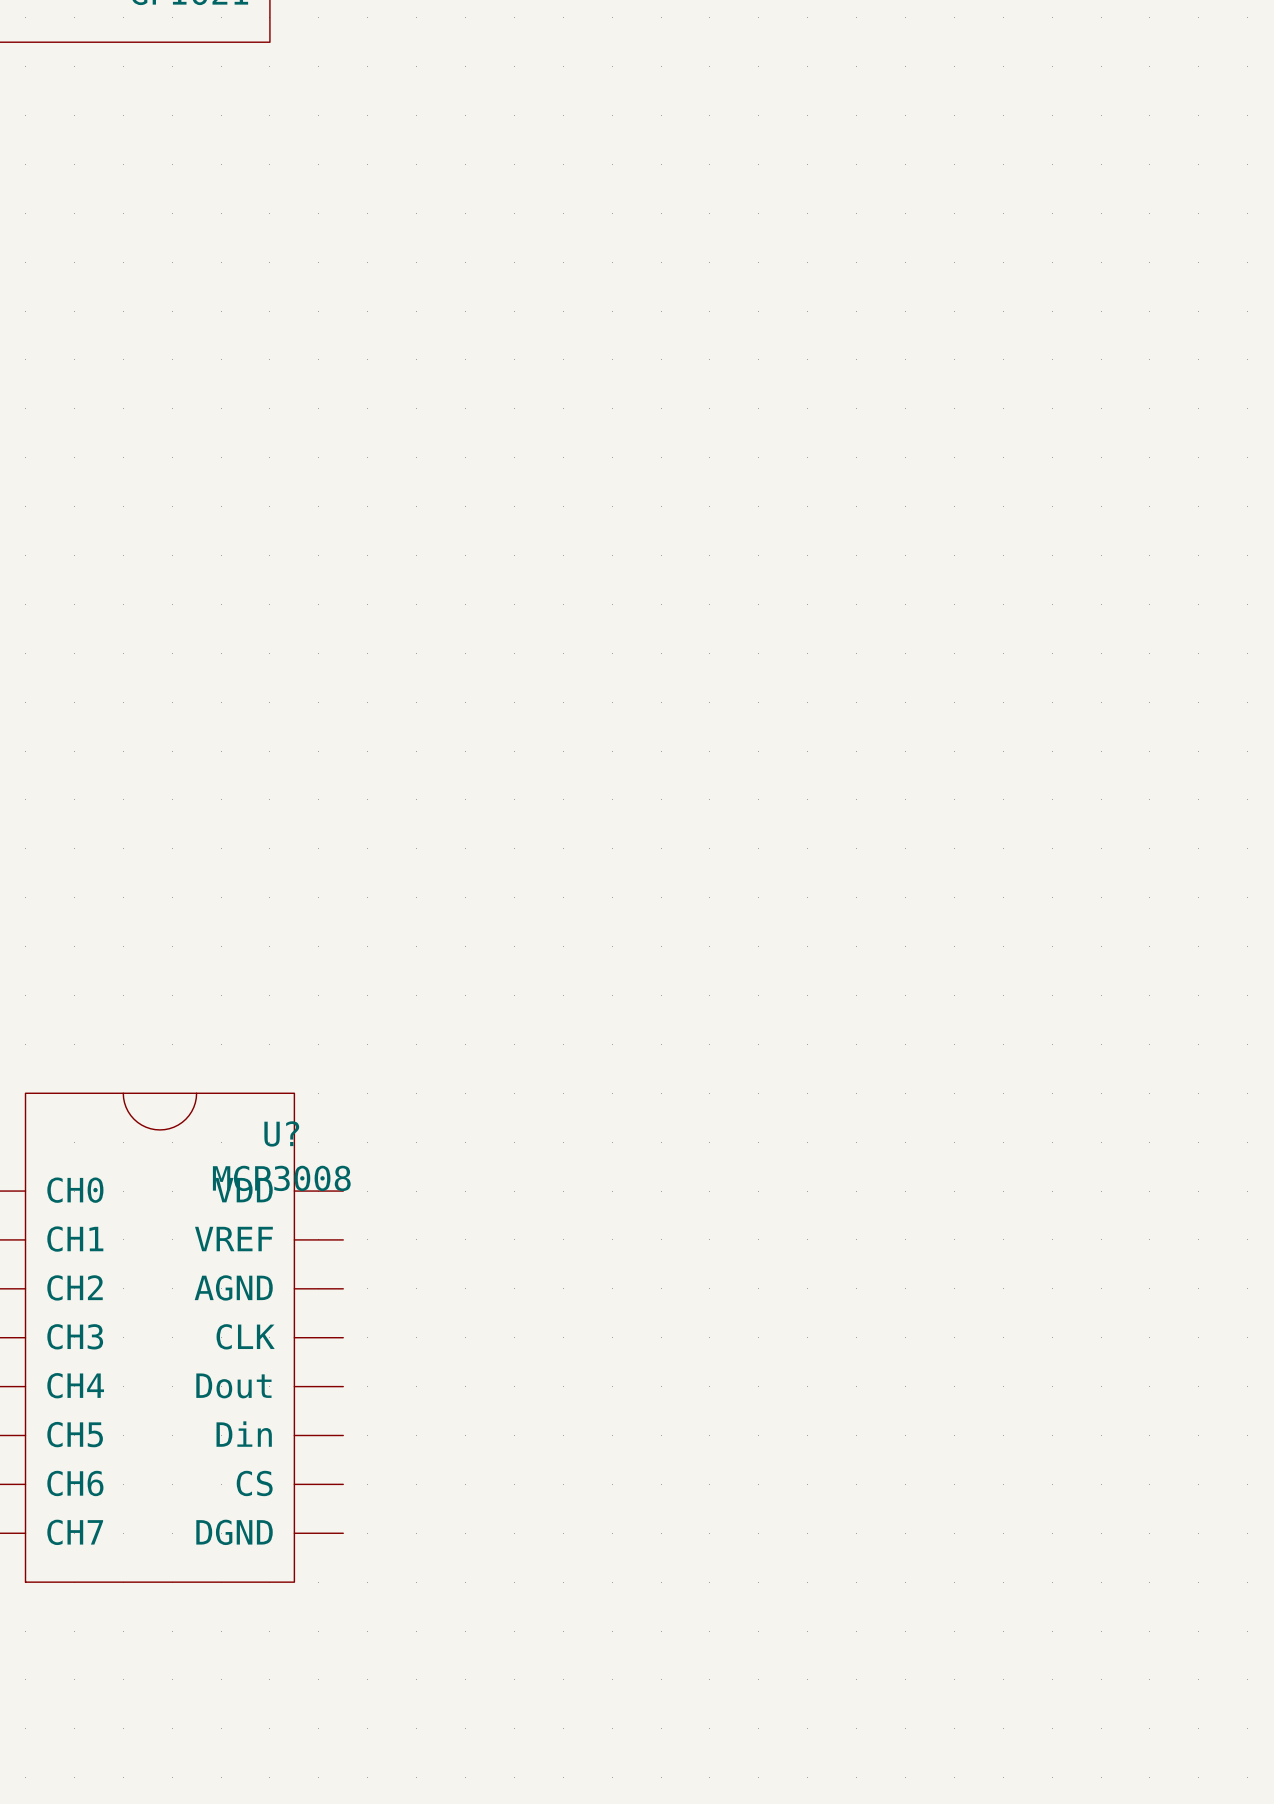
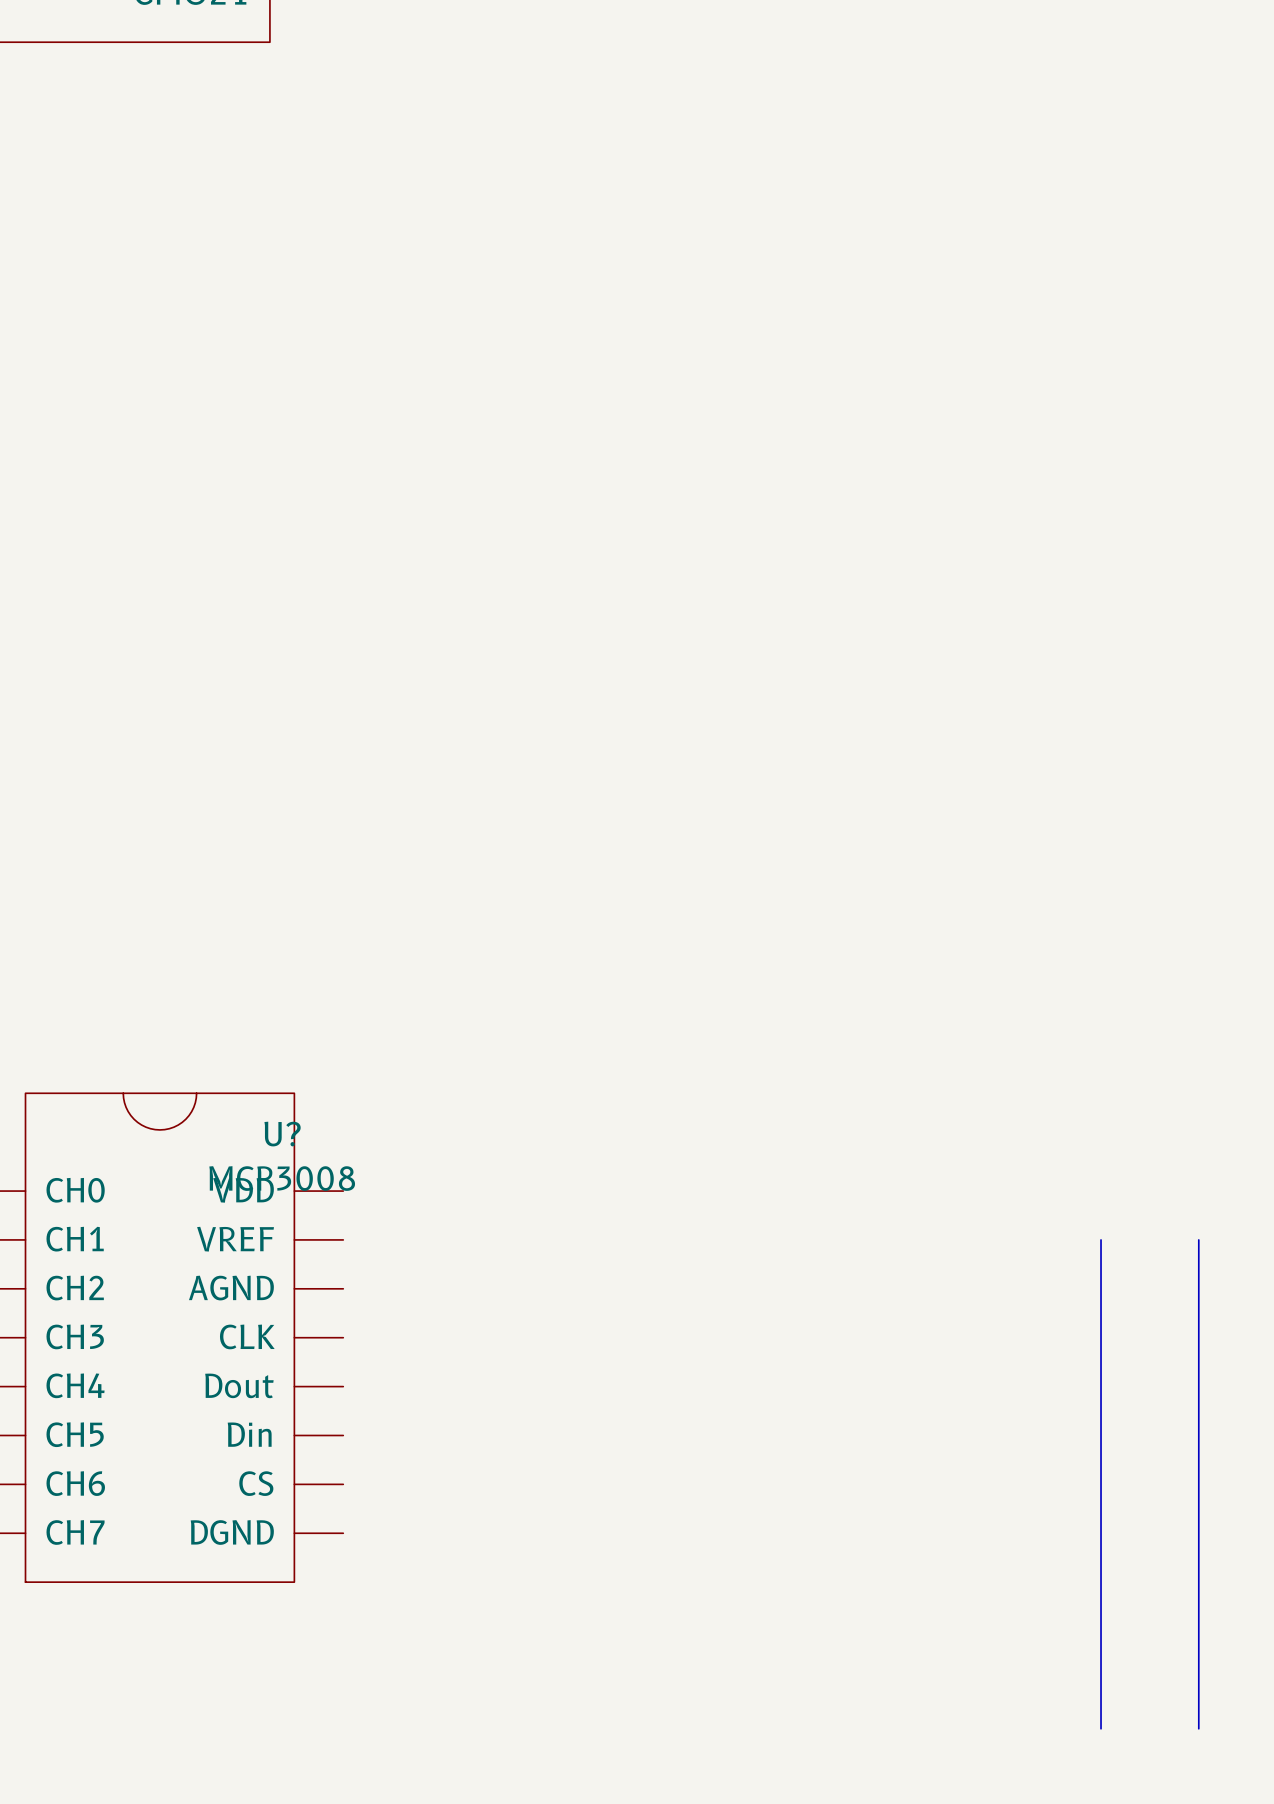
bus: none -> (1101, 1239) (1101, 1728)
bus: none -> (1198, 1239) (1198, 1728)

